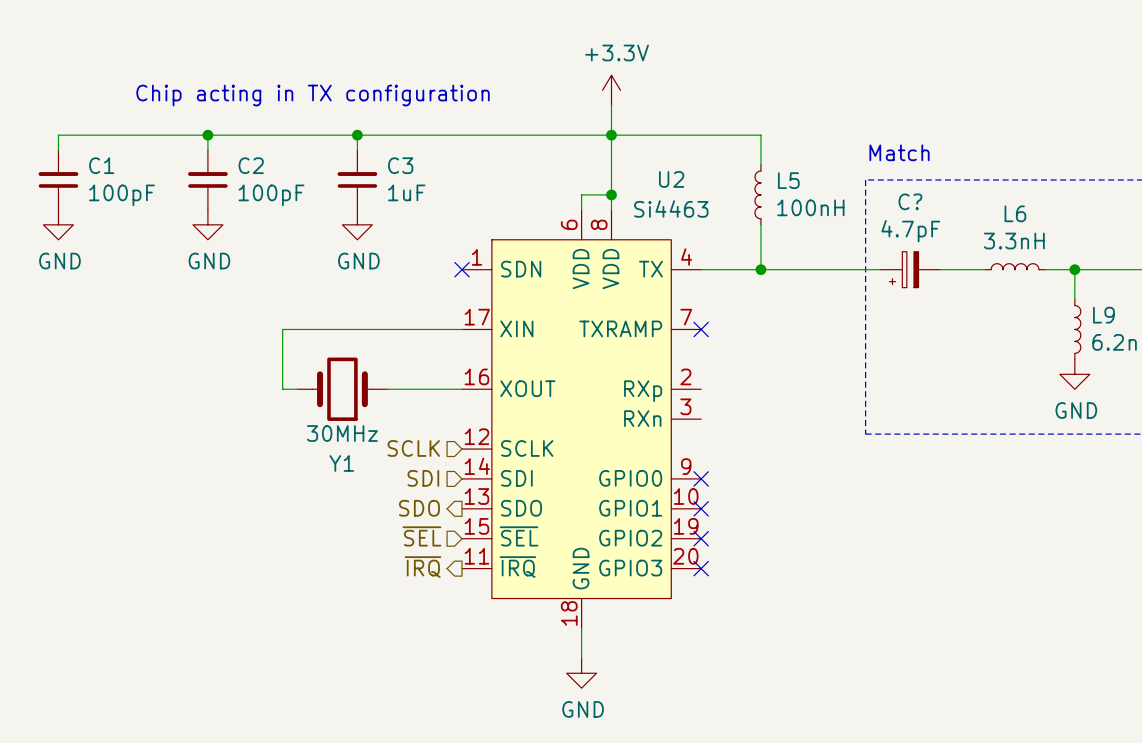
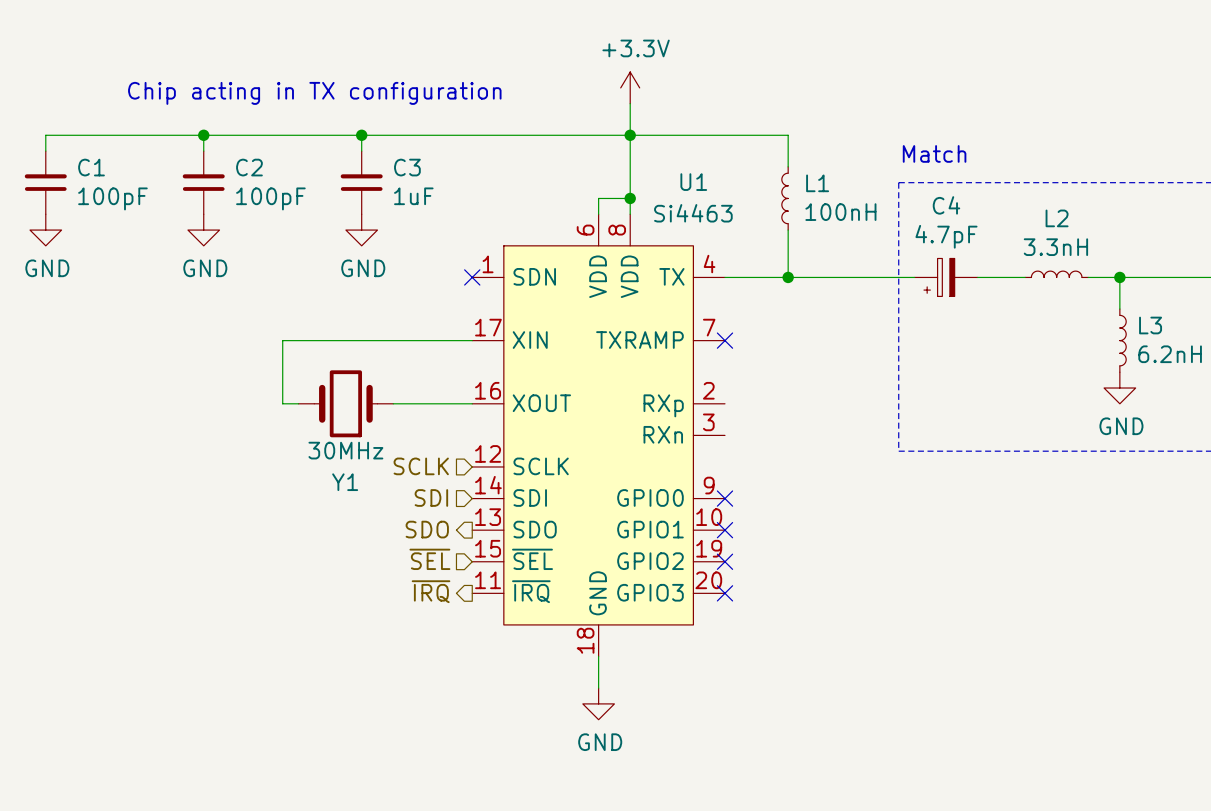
U2 name: U2 (671, 179) -> U1 (693, 182)
L5 name: L5 (788, 180) -> L1 (817, 183)
C? name: C? (910, 201) -> C4 (946, 205)
L6 name: L6 (1015, 213) -> L2 (1057, 218)
L9 name: L9 (1103, 315) -> L3 (1150, 325)

